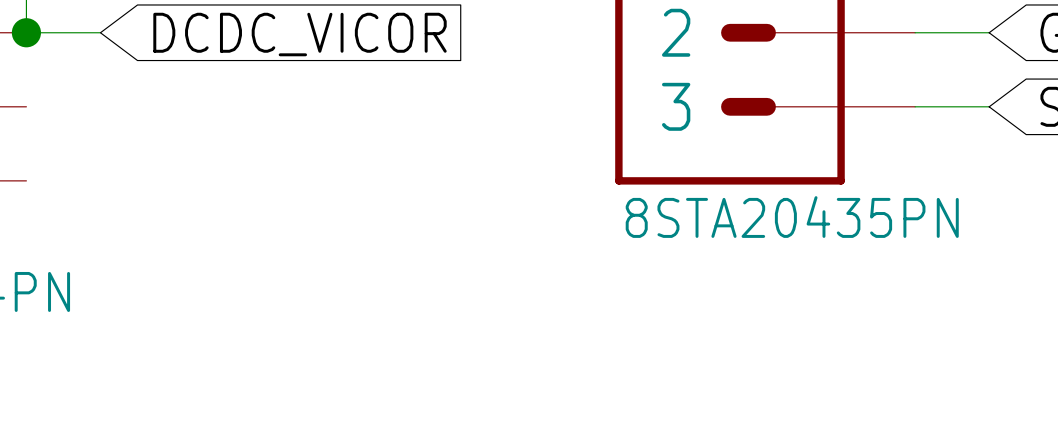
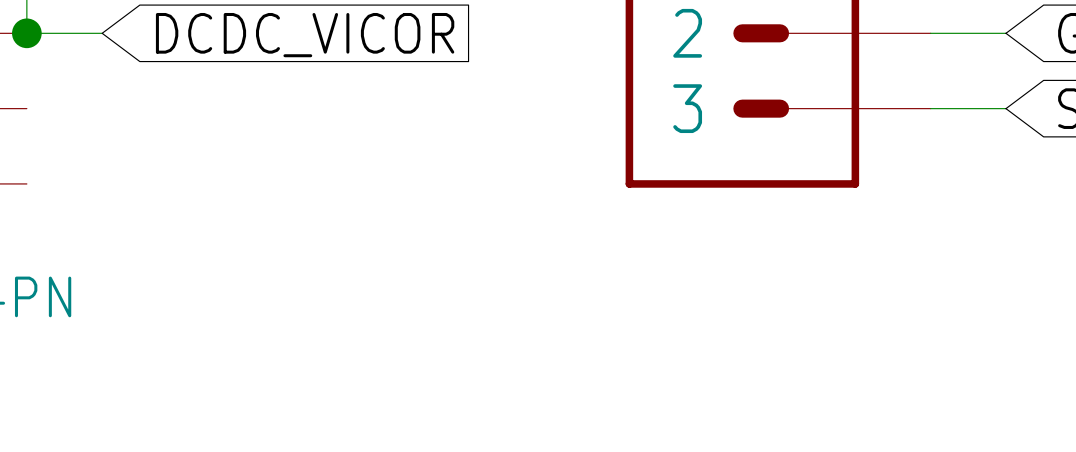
part text: 8STA20435PN (792, 217) -> none

